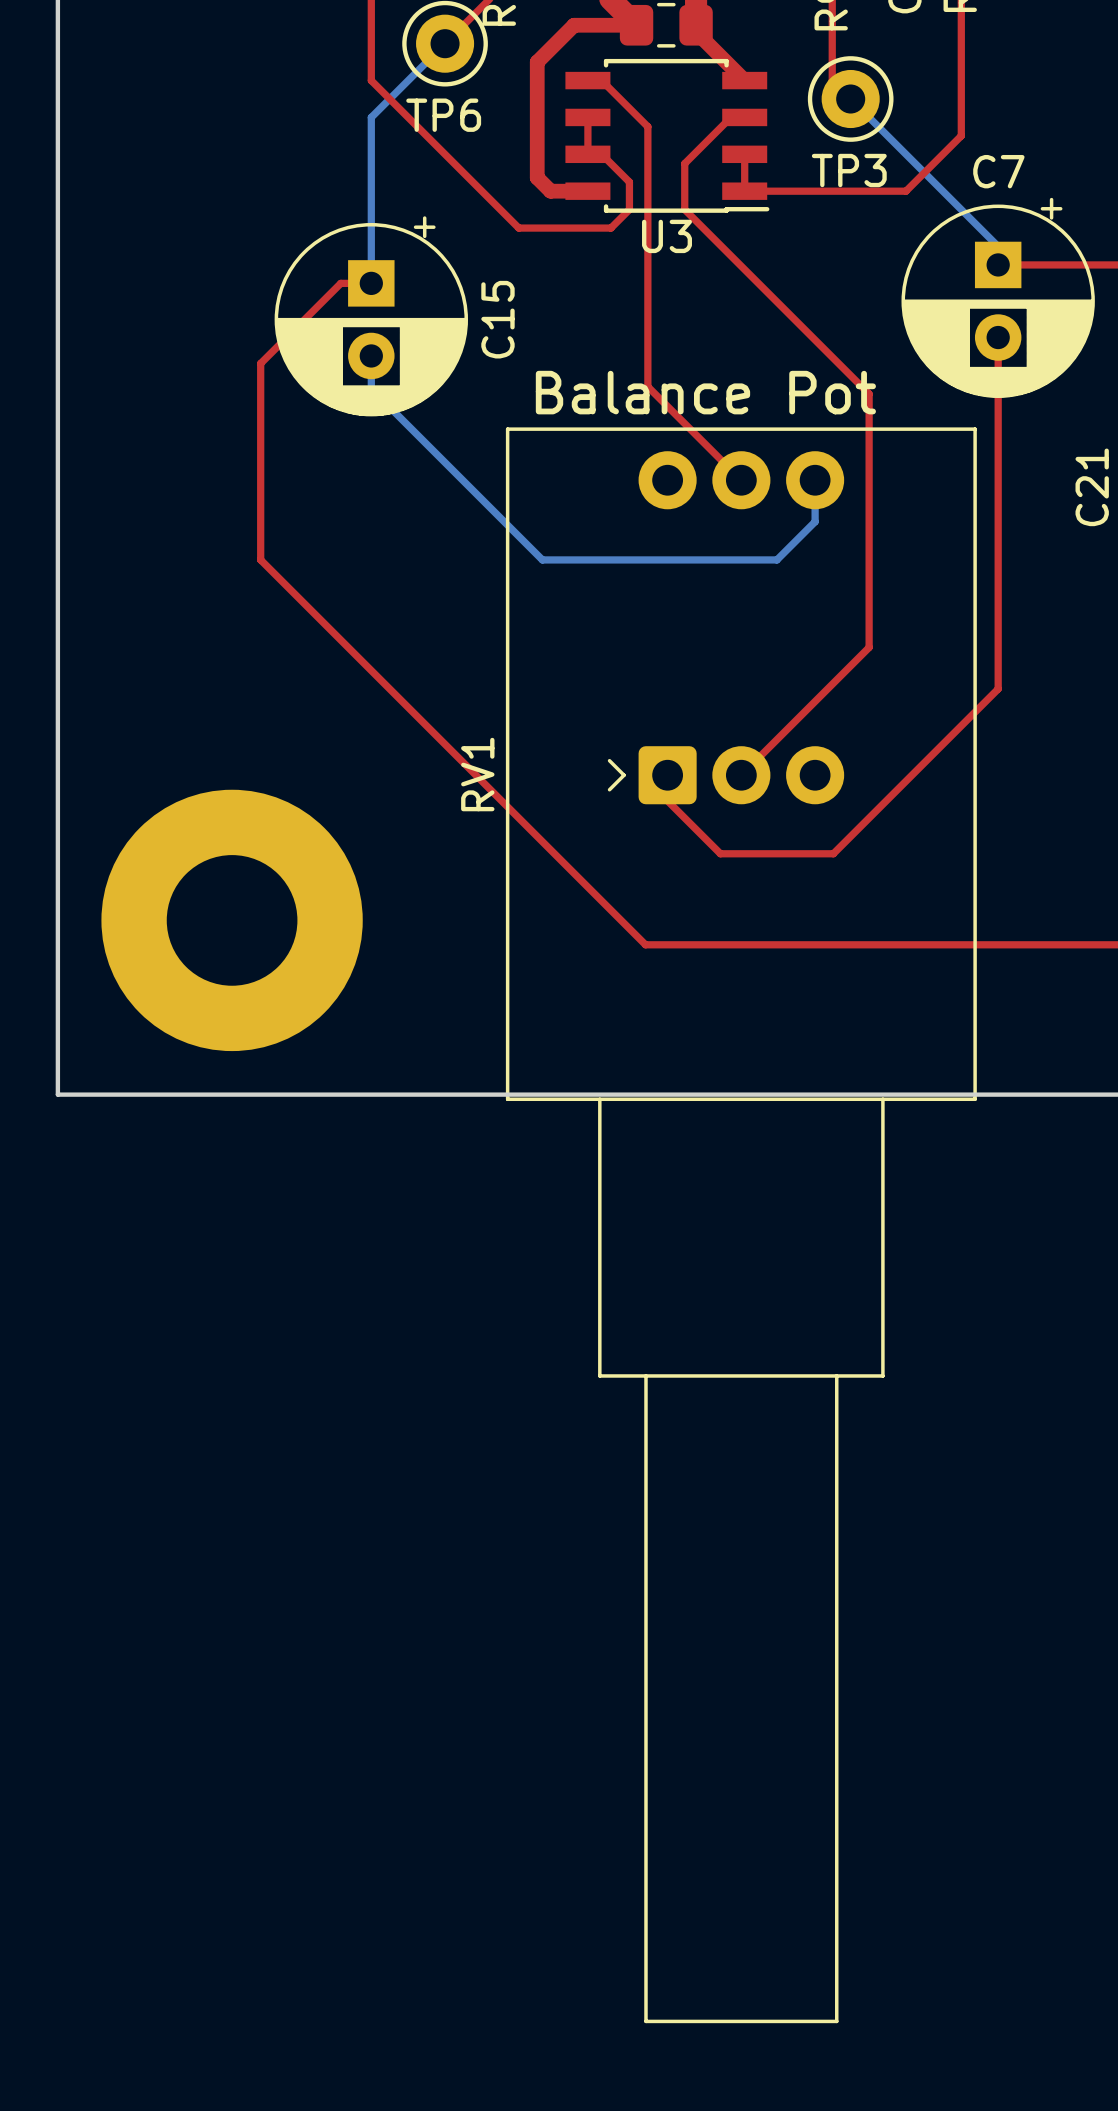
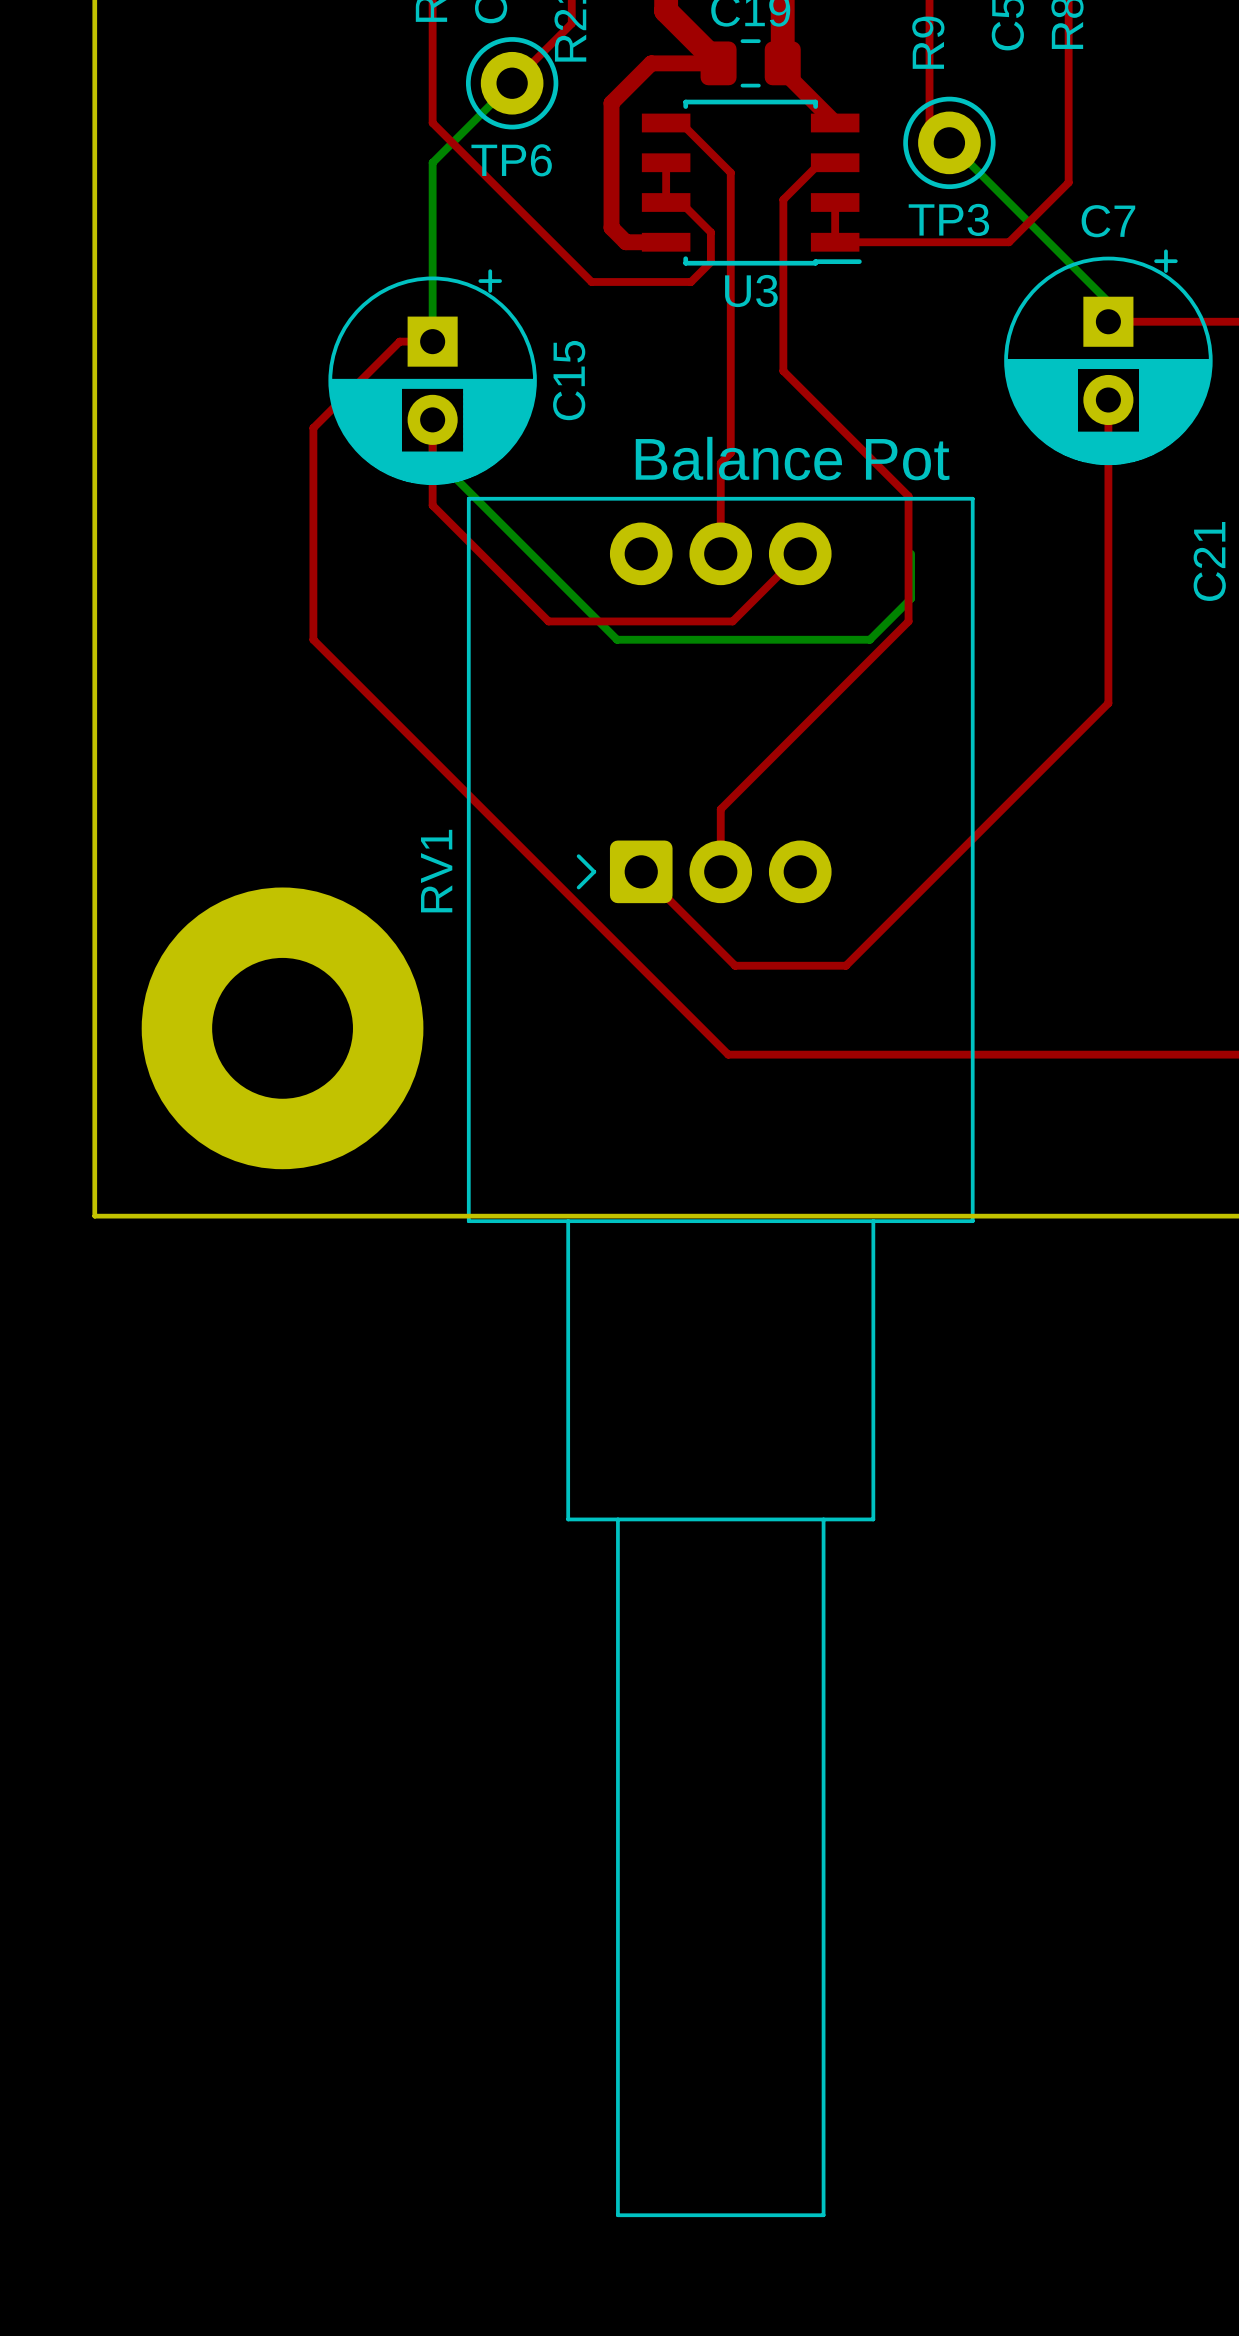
top track: (696, 151) (684, 163) (684, 209) (869, 394) (869, 647) (741, 775) -> (783, 199) (783, 371) (908, 496) (908, 621) (720, 809) (720, 871)
top track: none -> (432, 419) (432, 505) (548, 621) (732, 621) (800, 553)
top track: (647, 386) (741, 480) -> (730, 453) (720, 463) (720, 553)
top track: (998, 618) (998, 689) (833, 853) (720, 853) (666, 799) (667, 775) -> (1108, 703) (845, 965) (735, 965) (641, 871)
RV1 position: (741, 1225) -> (720, 1356)

